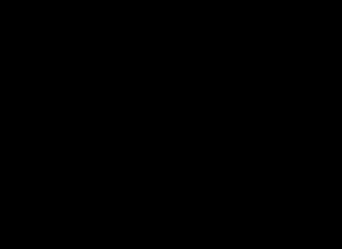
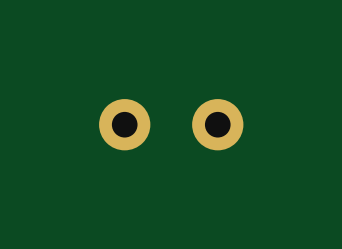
part: none -> (171, 124)

